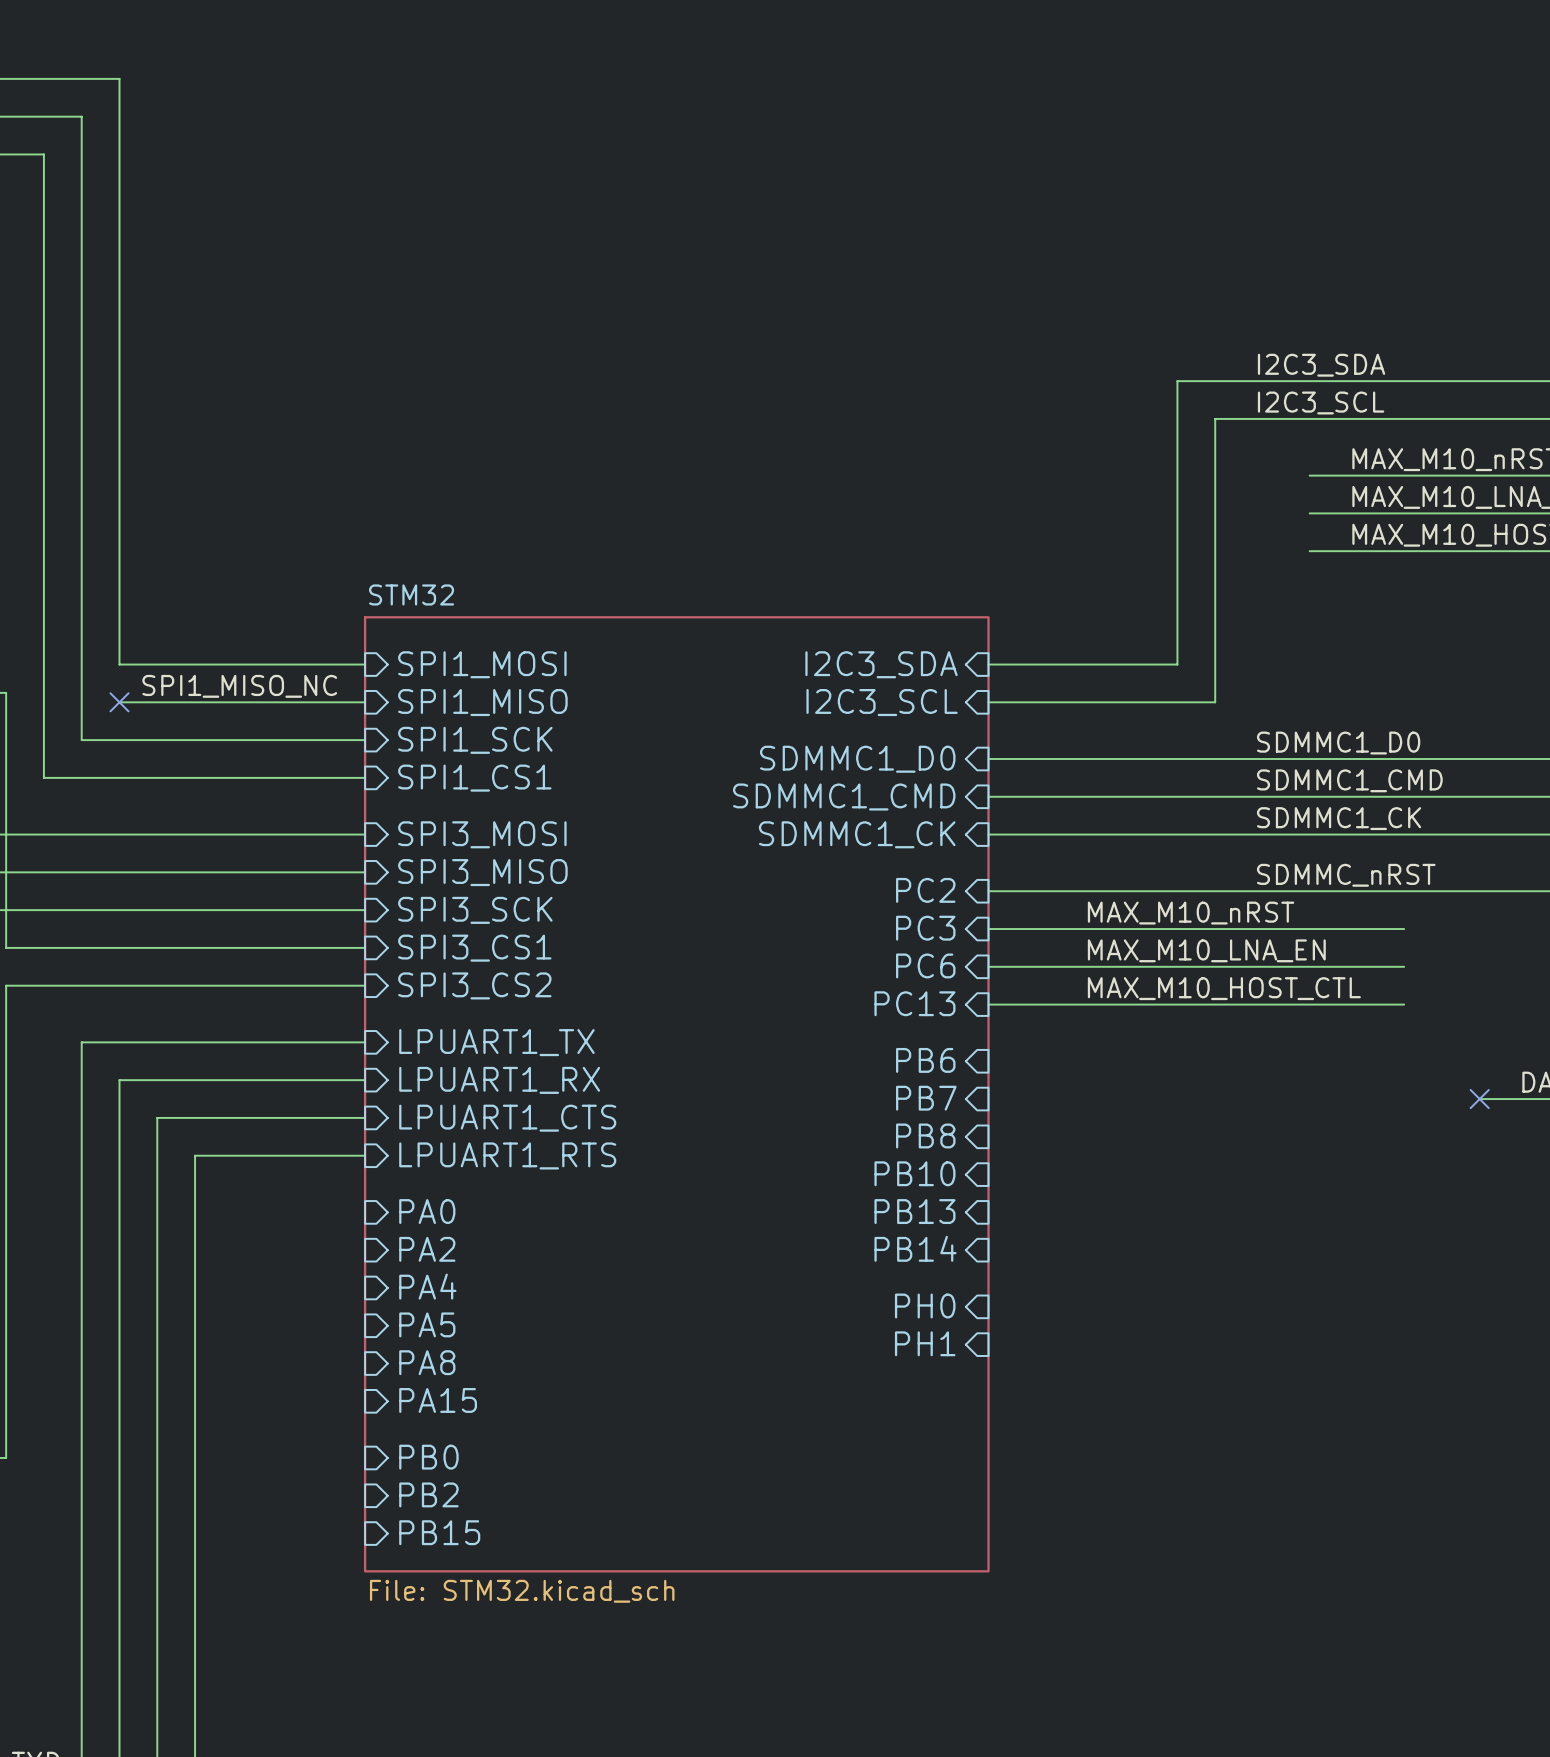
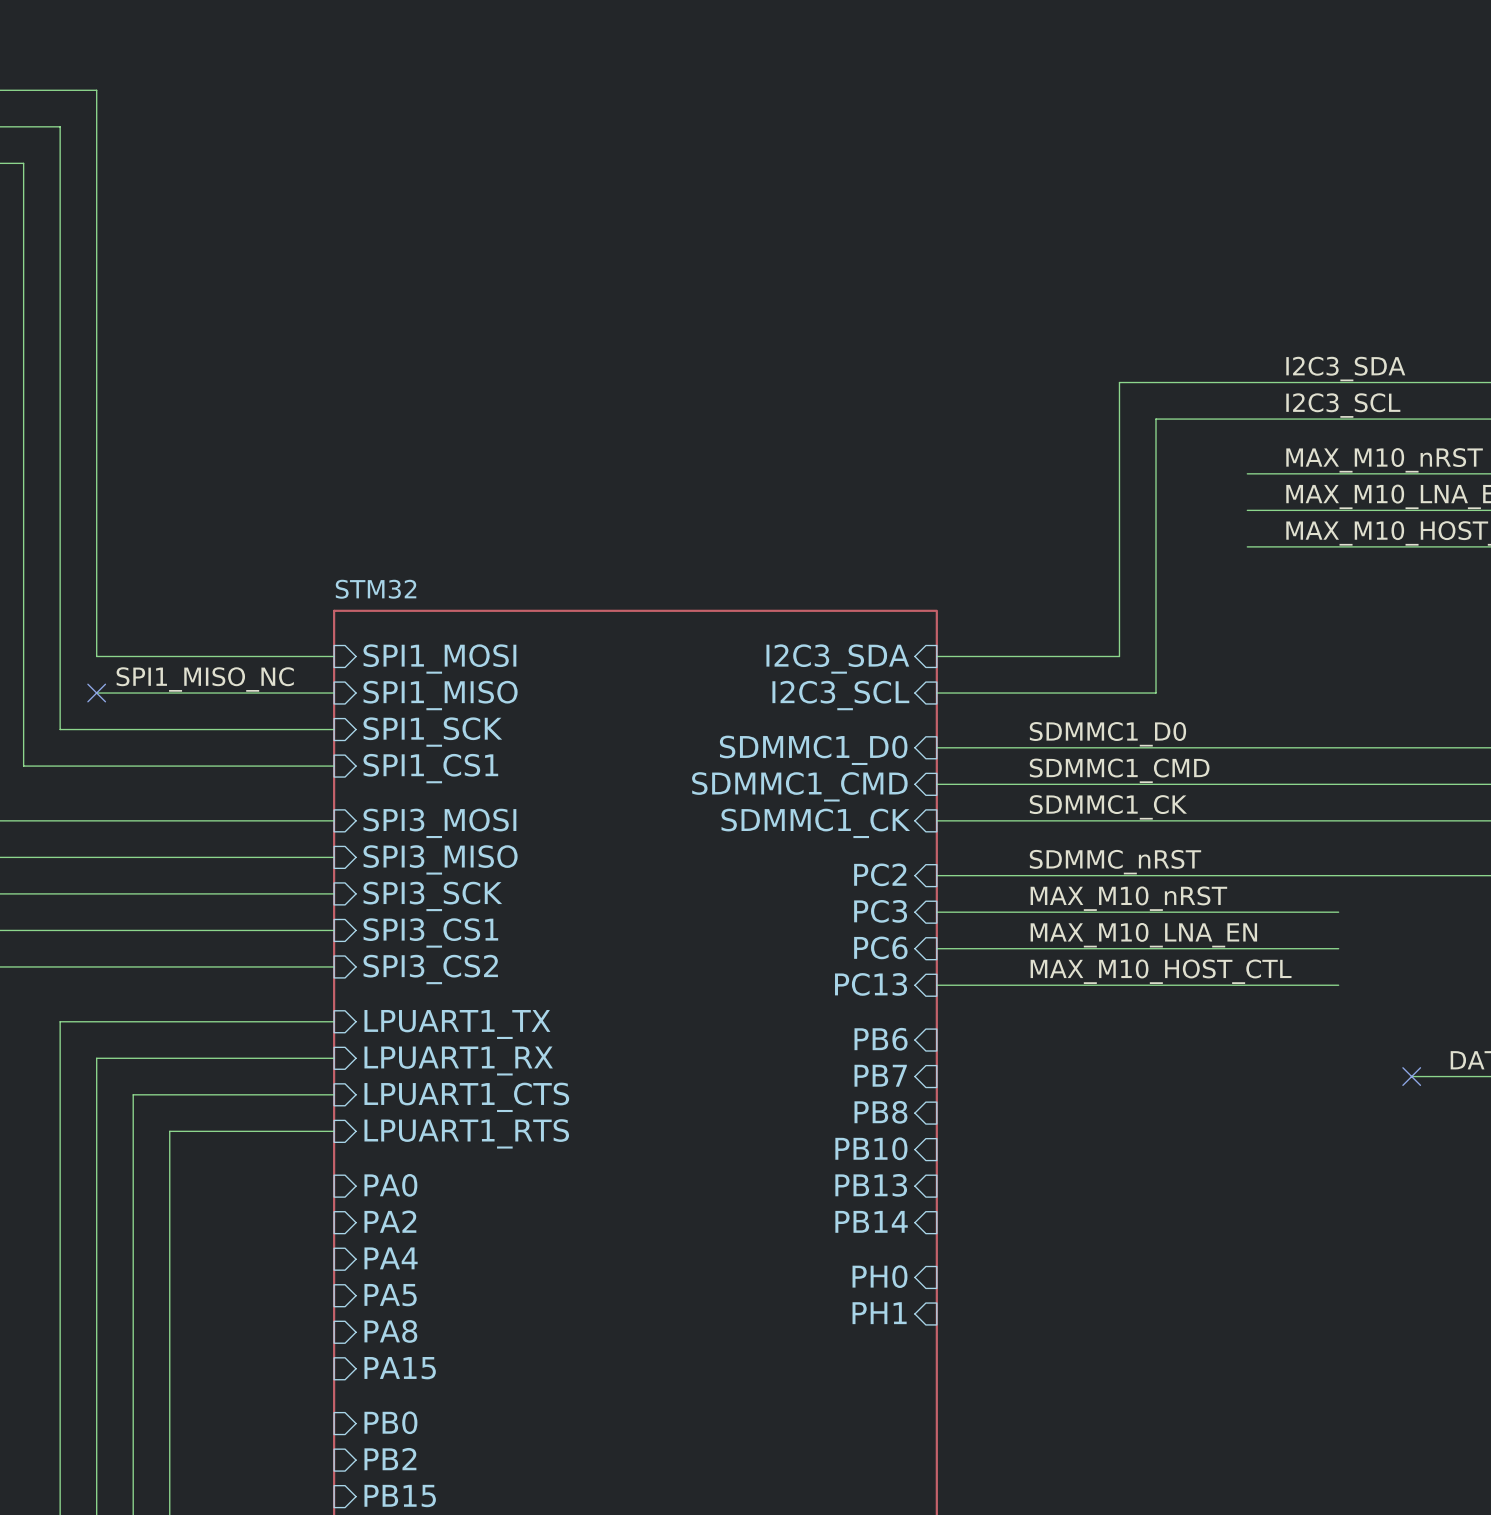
label position: I2C3_SDA (1321, 365) -> I2C3_SDA (1345, 369)
label position: I2C3_SCL (1321, 402) -> I2C3_SCL (1343, 405)
label position: SDMMC1_D0 (1338, 743) -> SDMMC1_D0 (1107, 734)
label position: SDMMC1_CMD (1349, 780) -> SDMMC1_CMD (1119, 770)
label position: SDMMC1_CK (1339, 818) -> SDMMC1_CK (1108, 807)
label position: SDMMC_nRST (1346, 875) -> SDMMC_nRST (1115, 862)

